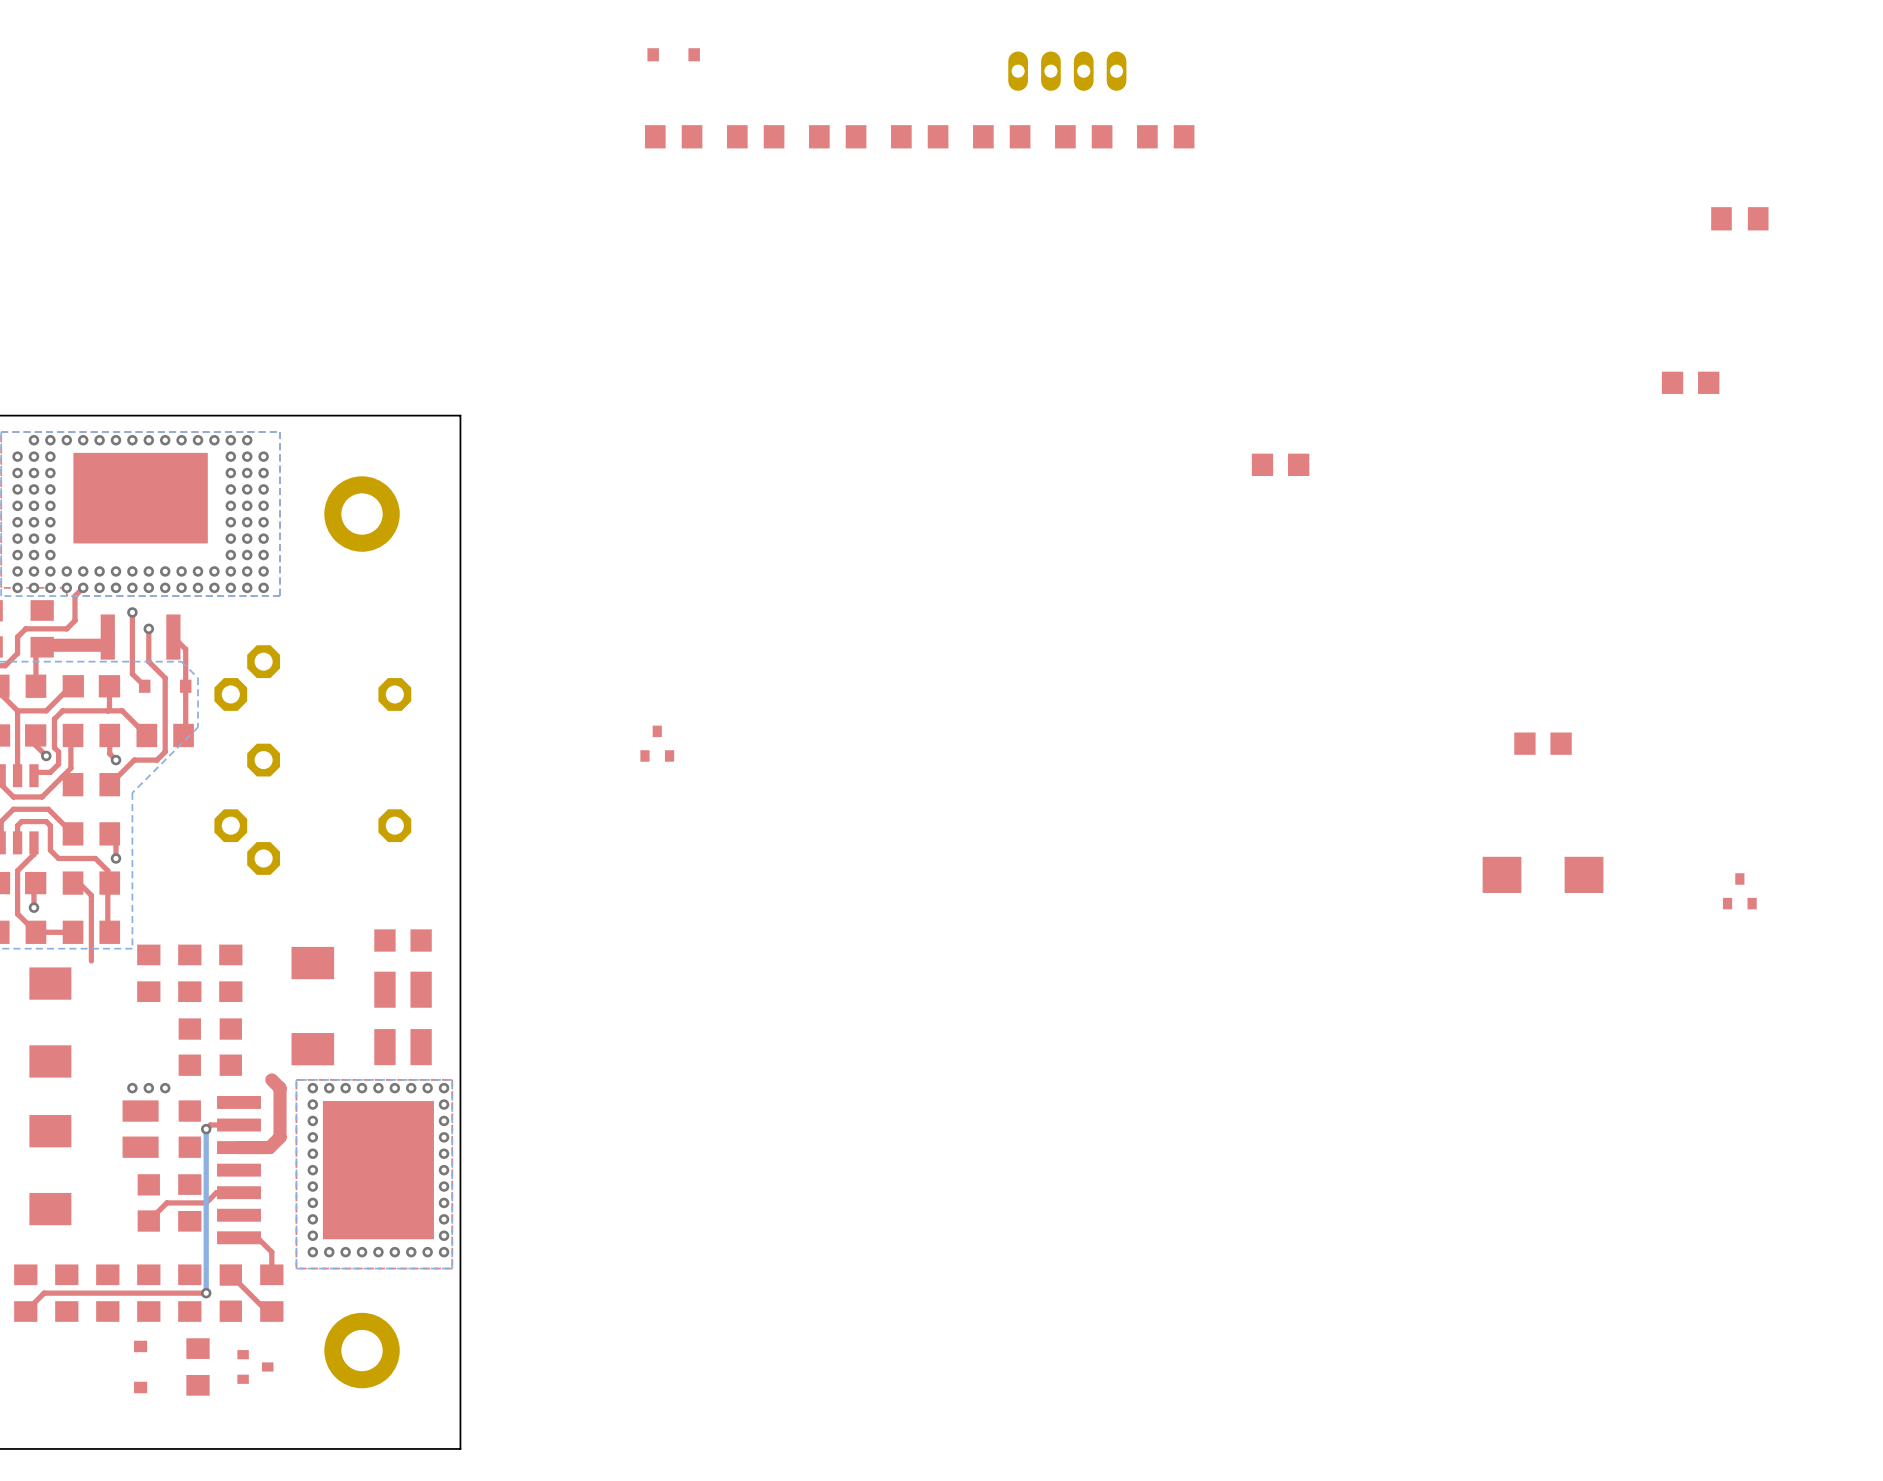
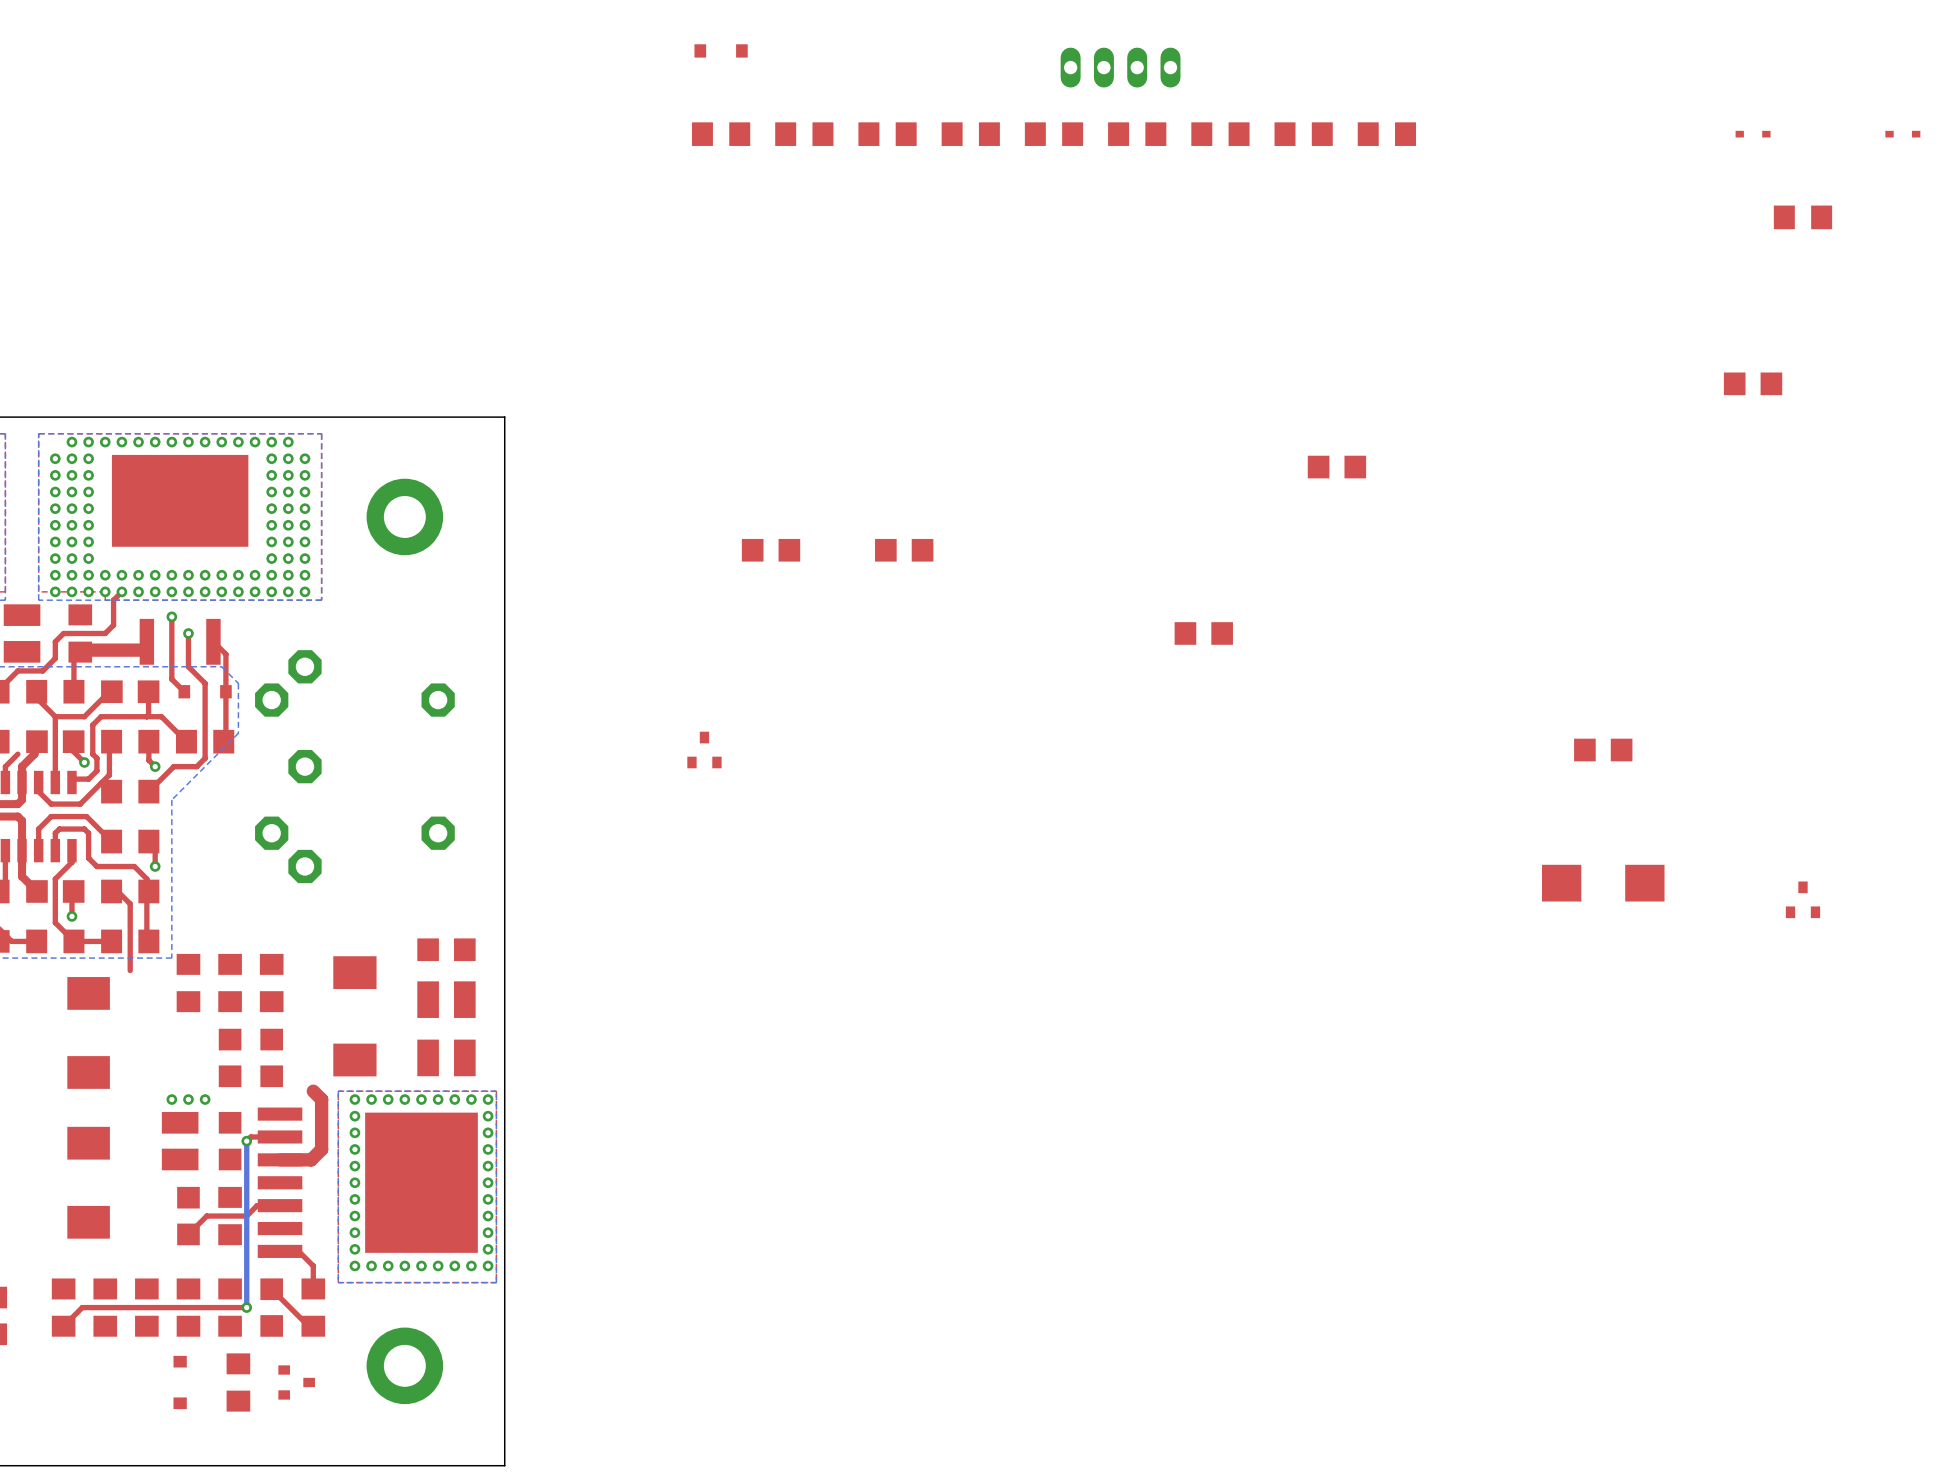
part: none -> (1303, 134)
part: none -> (1386, 134)
part: none -> (1753, 134)
part: none -> (1902, 134)
part: none -> (771, 550)
part: none -> (904, 550)
part: none -> (1203, 633)

